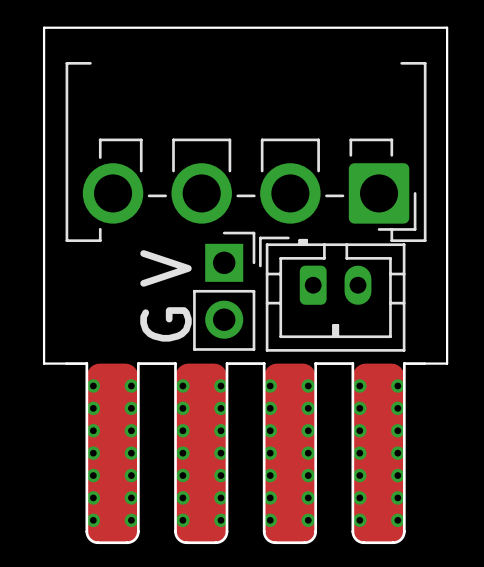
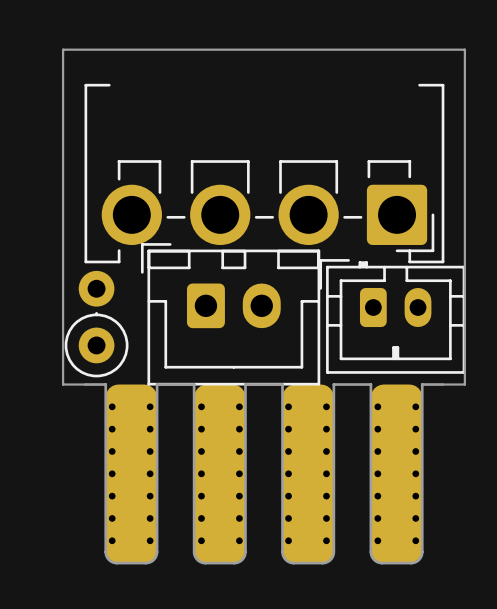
part footprint: [193, 231, 256, 351] -> [140, 243, 321, 386]
text: V (166, 268) -> none
part position: (332, 294) -> (392, 316)
part: none -> (96, 324)
text: G (166, 324) -> none

